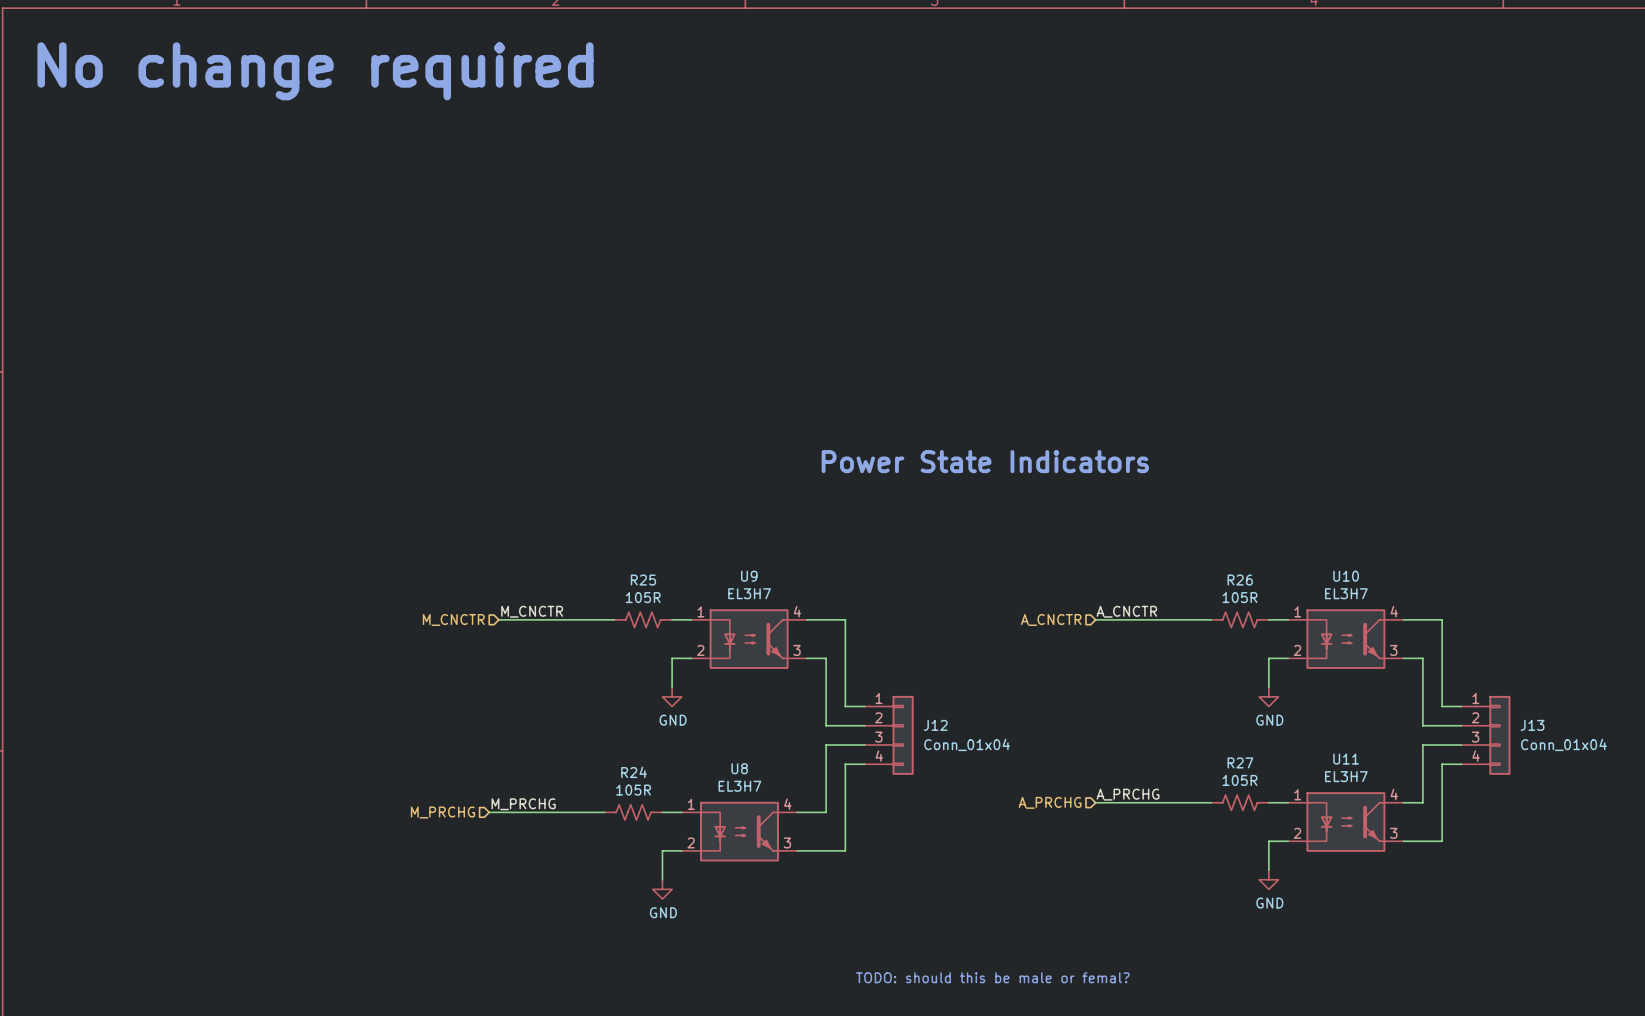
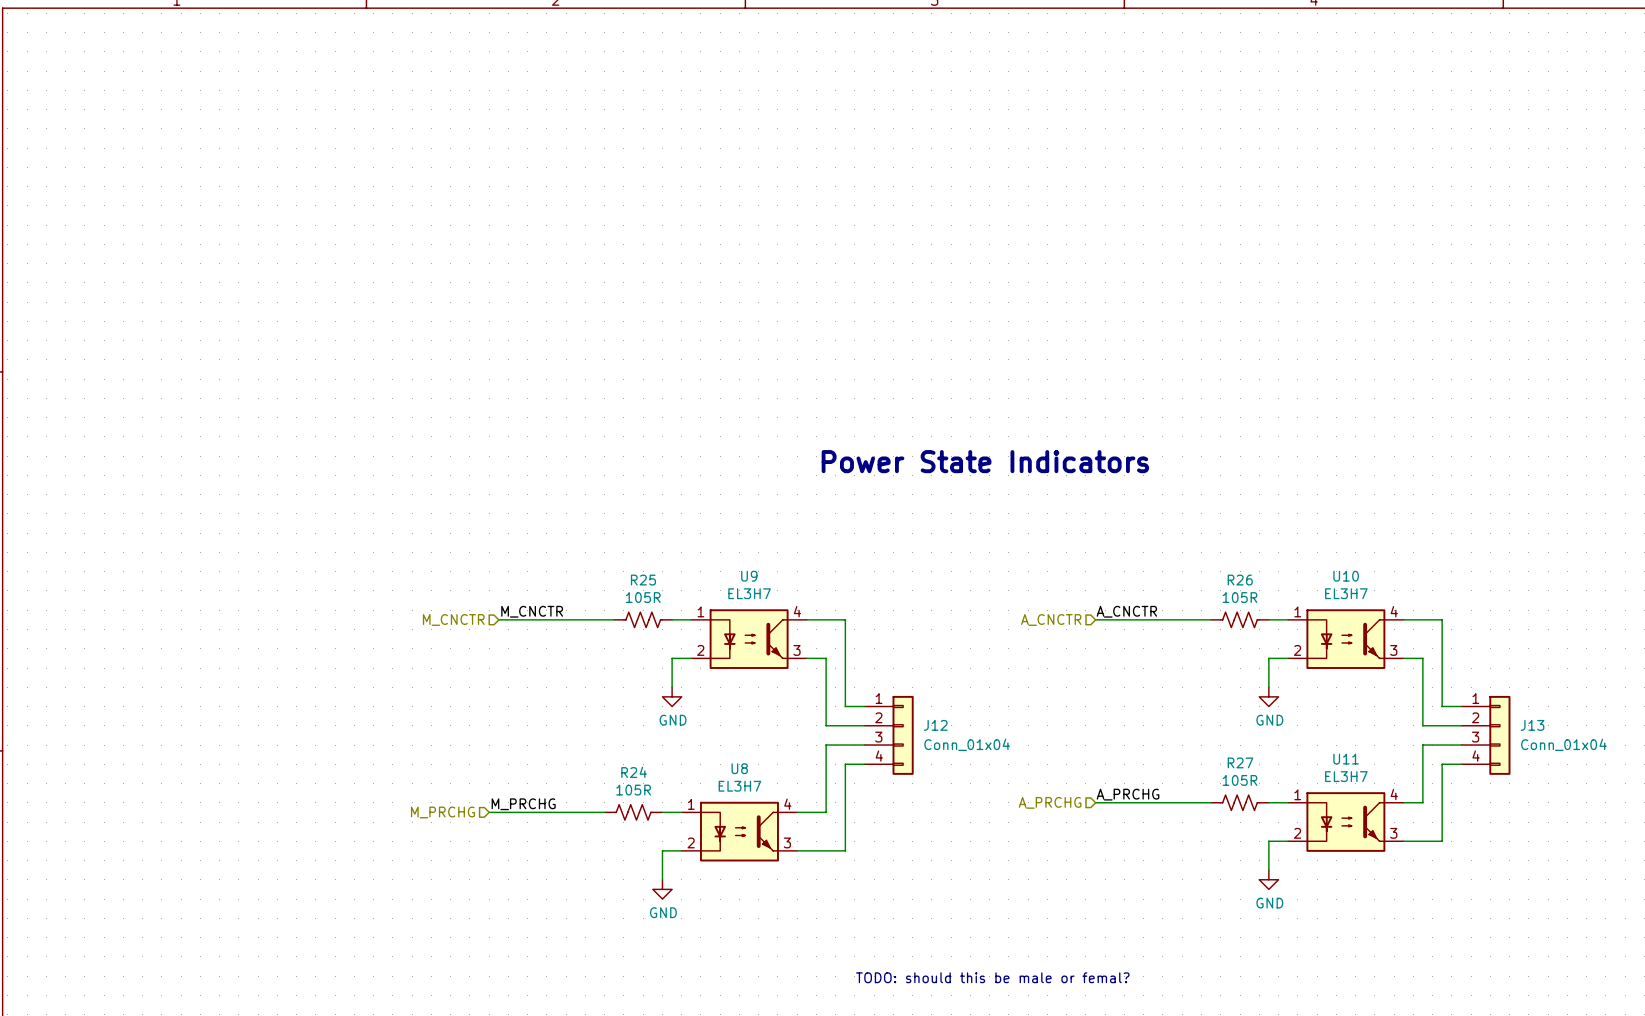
text: No change required (315, 71) -> none

